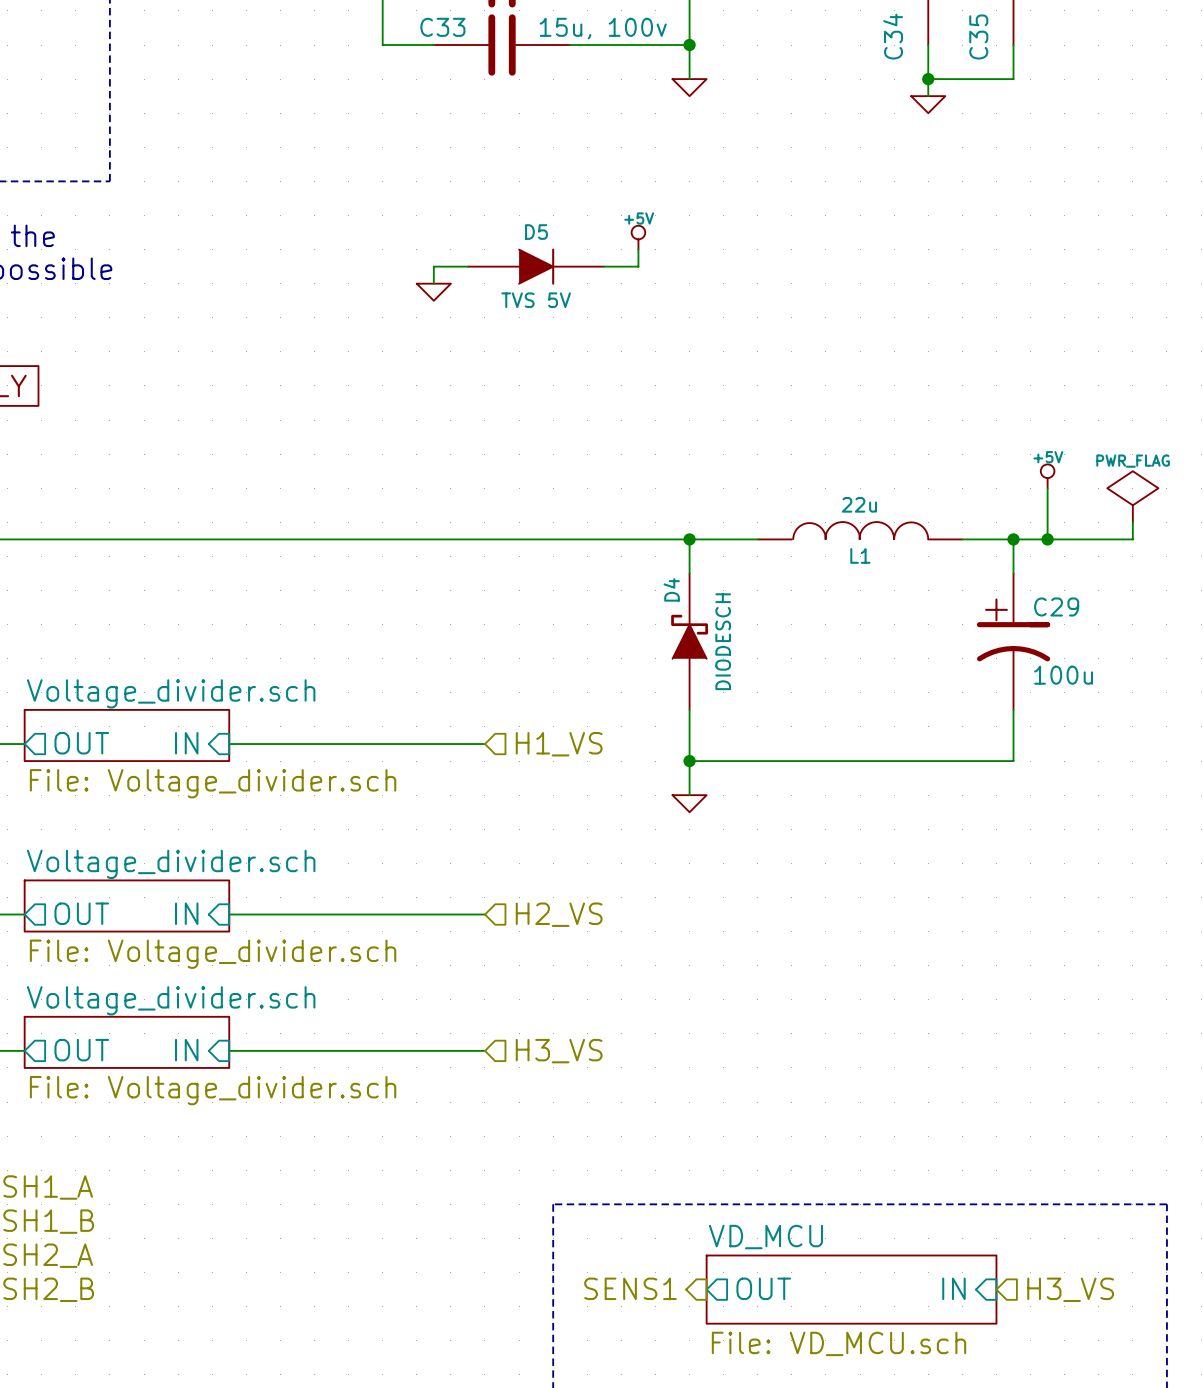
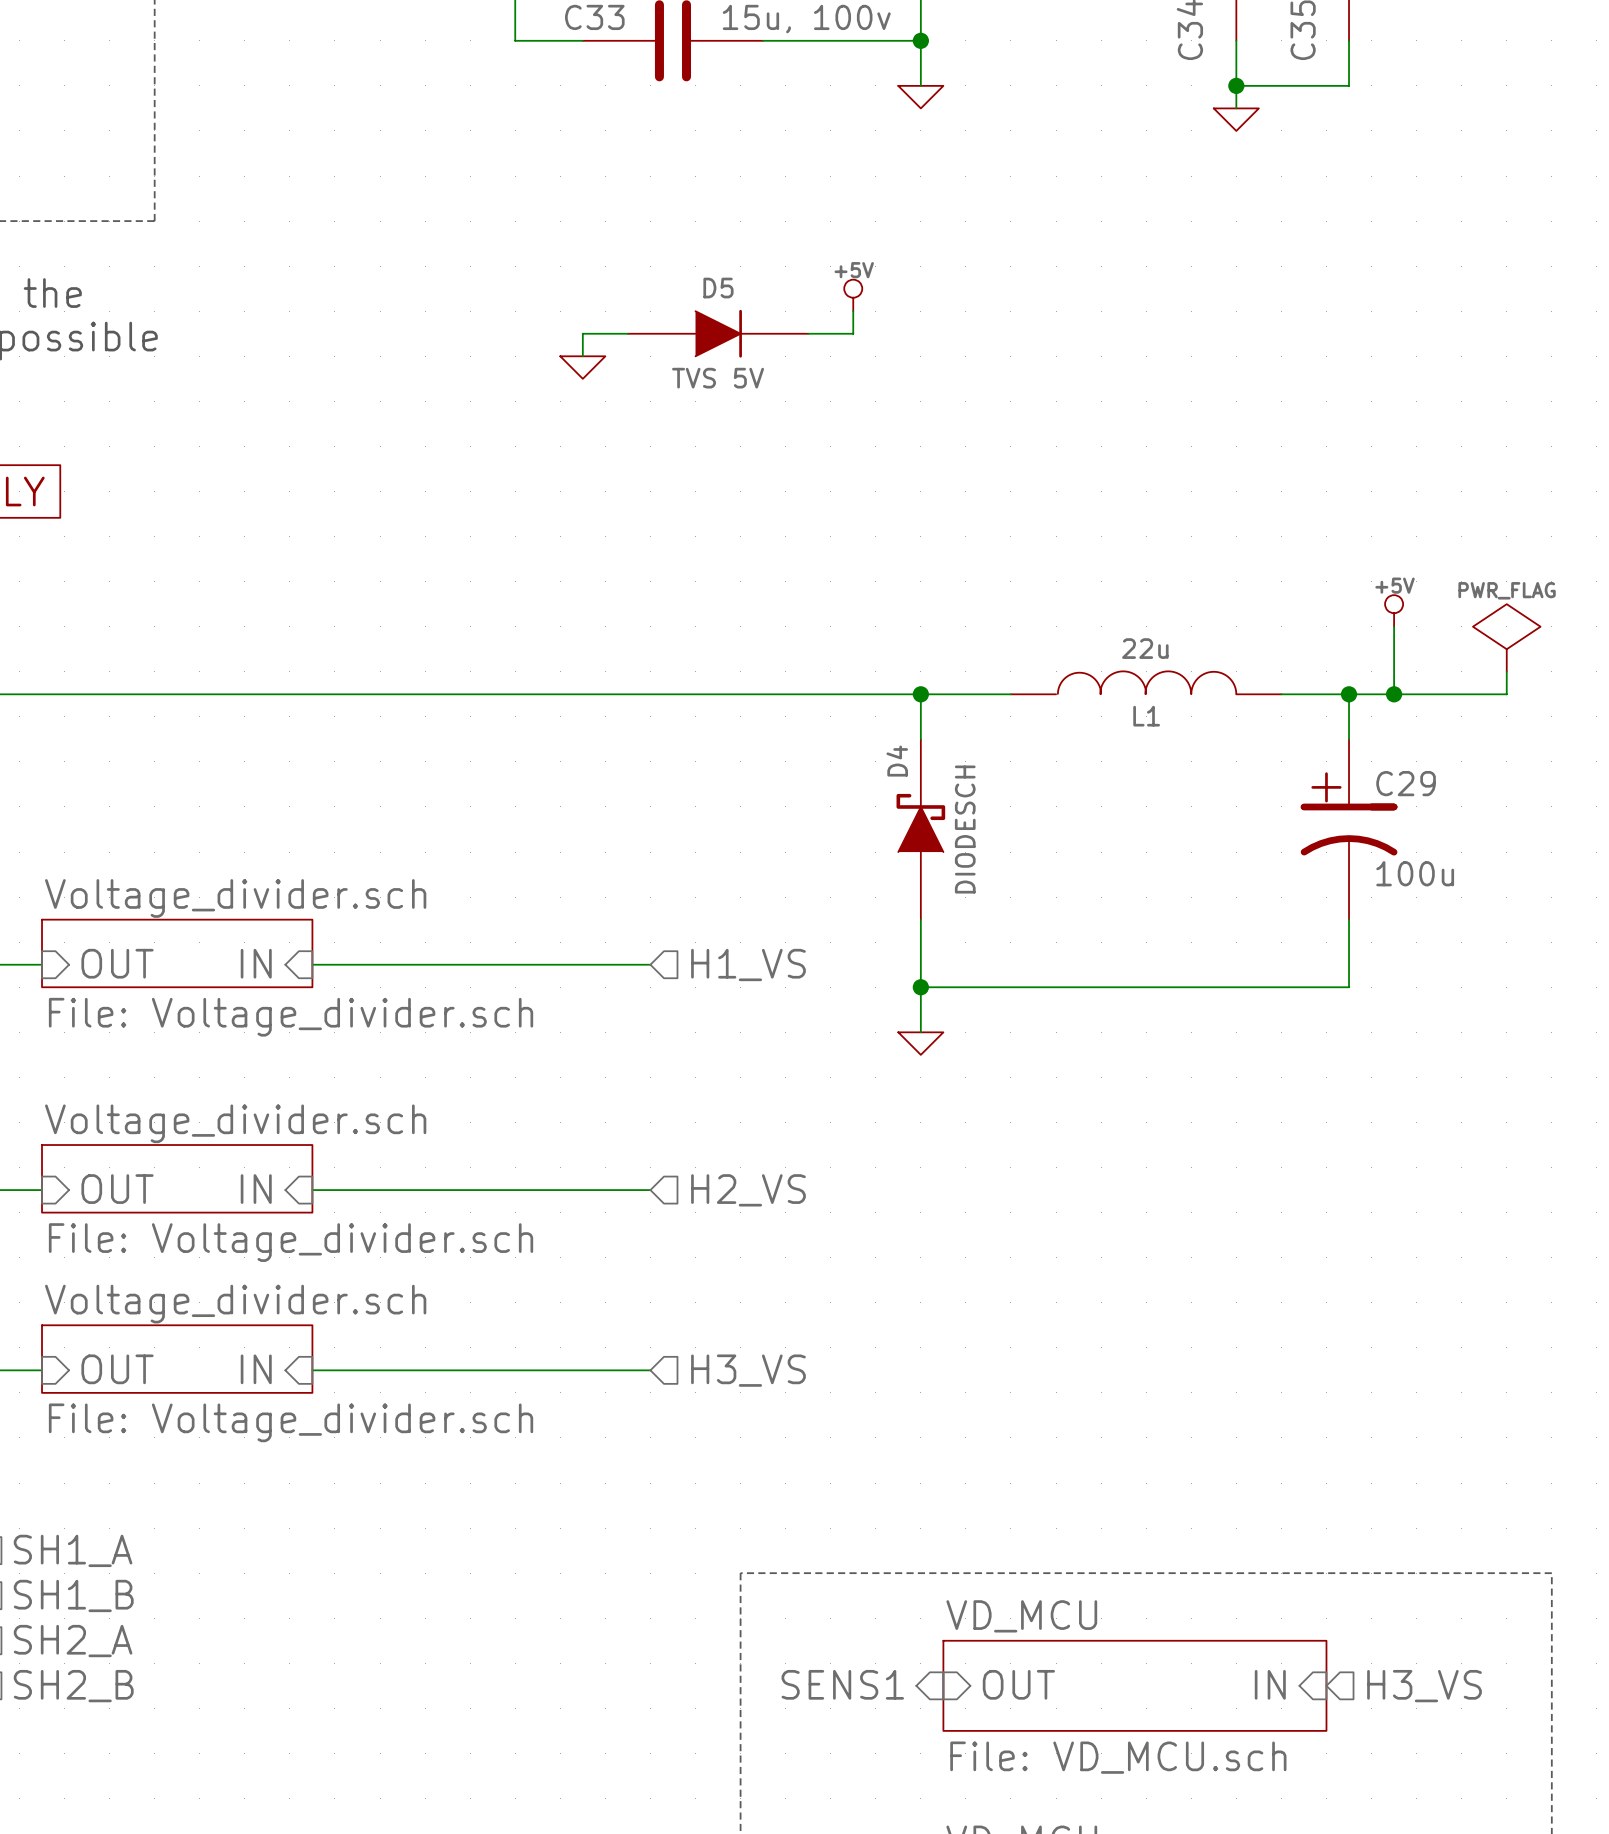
sheet pin shape: output (81, 743) -> input (117, 963)
sheet pin shape: output (81, 913) -> input (117, 1189)
sheet pin shape: output (81, 1050) -> input (117, 1369)
sheet pin shape: output (763, 1288) -> input (1018, 1684)

